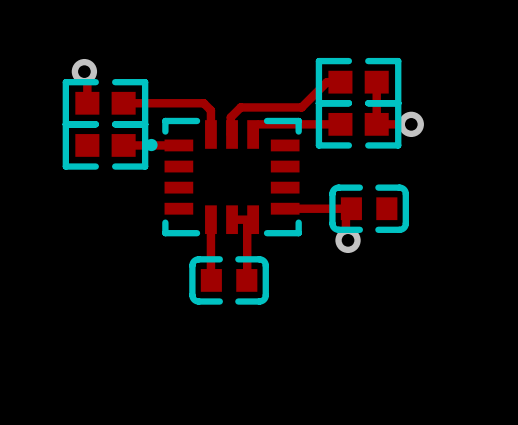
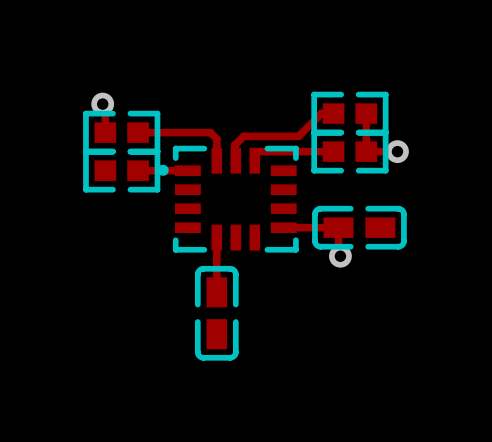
part footprint: [329, 184, 409, 233] -> [312, 205, 407, 250]
top track: (232, 219) (253, 219) (247, 225) (247, 280) -> none
part footprint: [189, 256, 269, 305] -> [194, 265, 239, 361]

